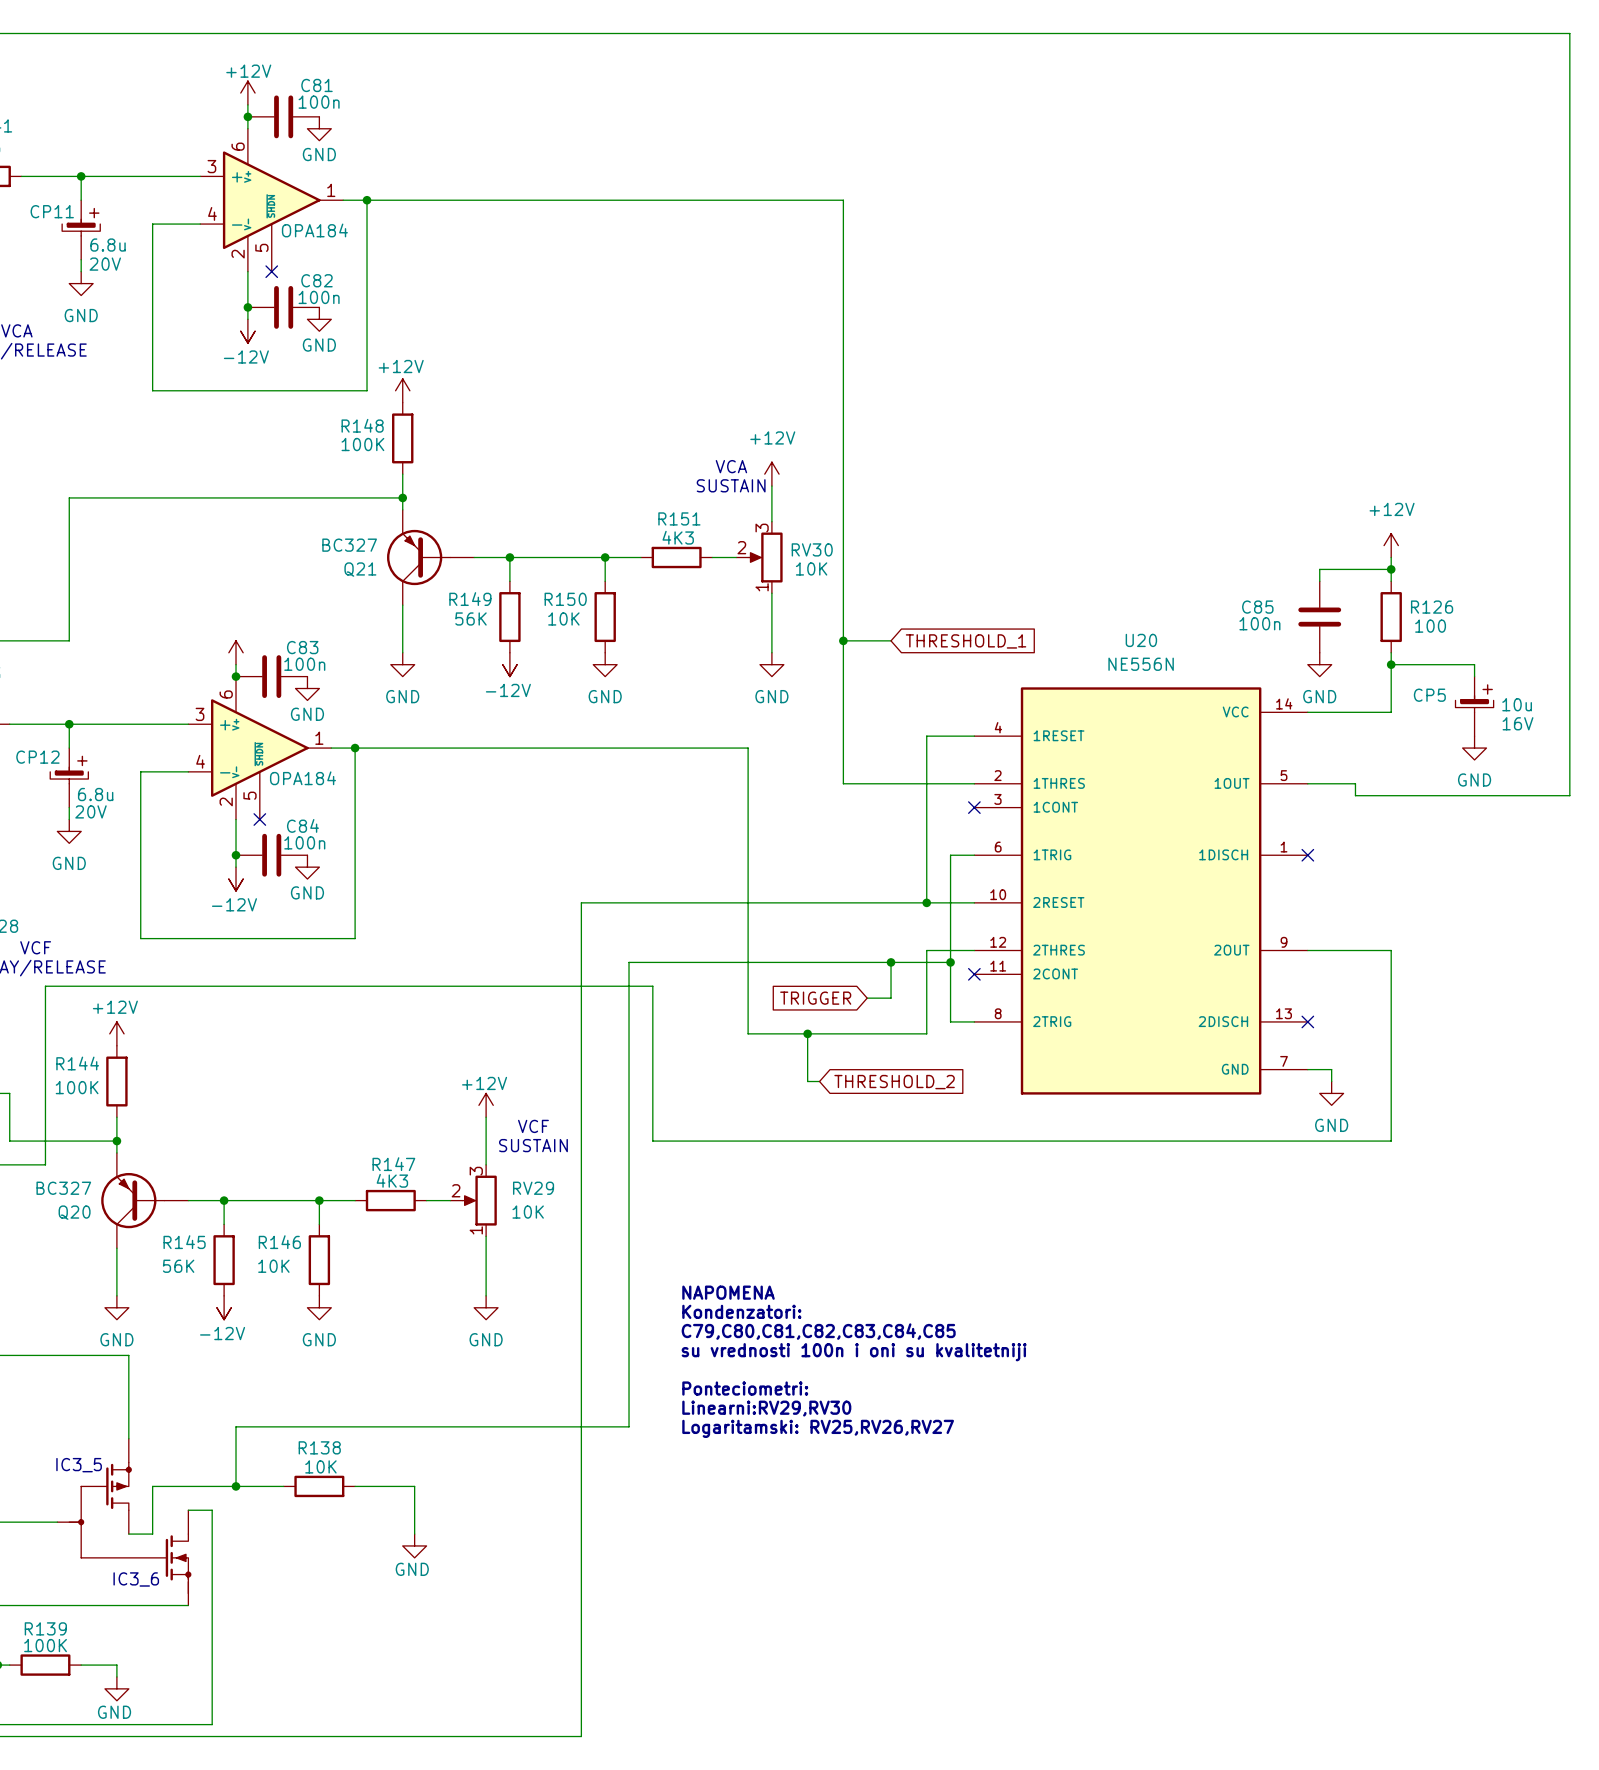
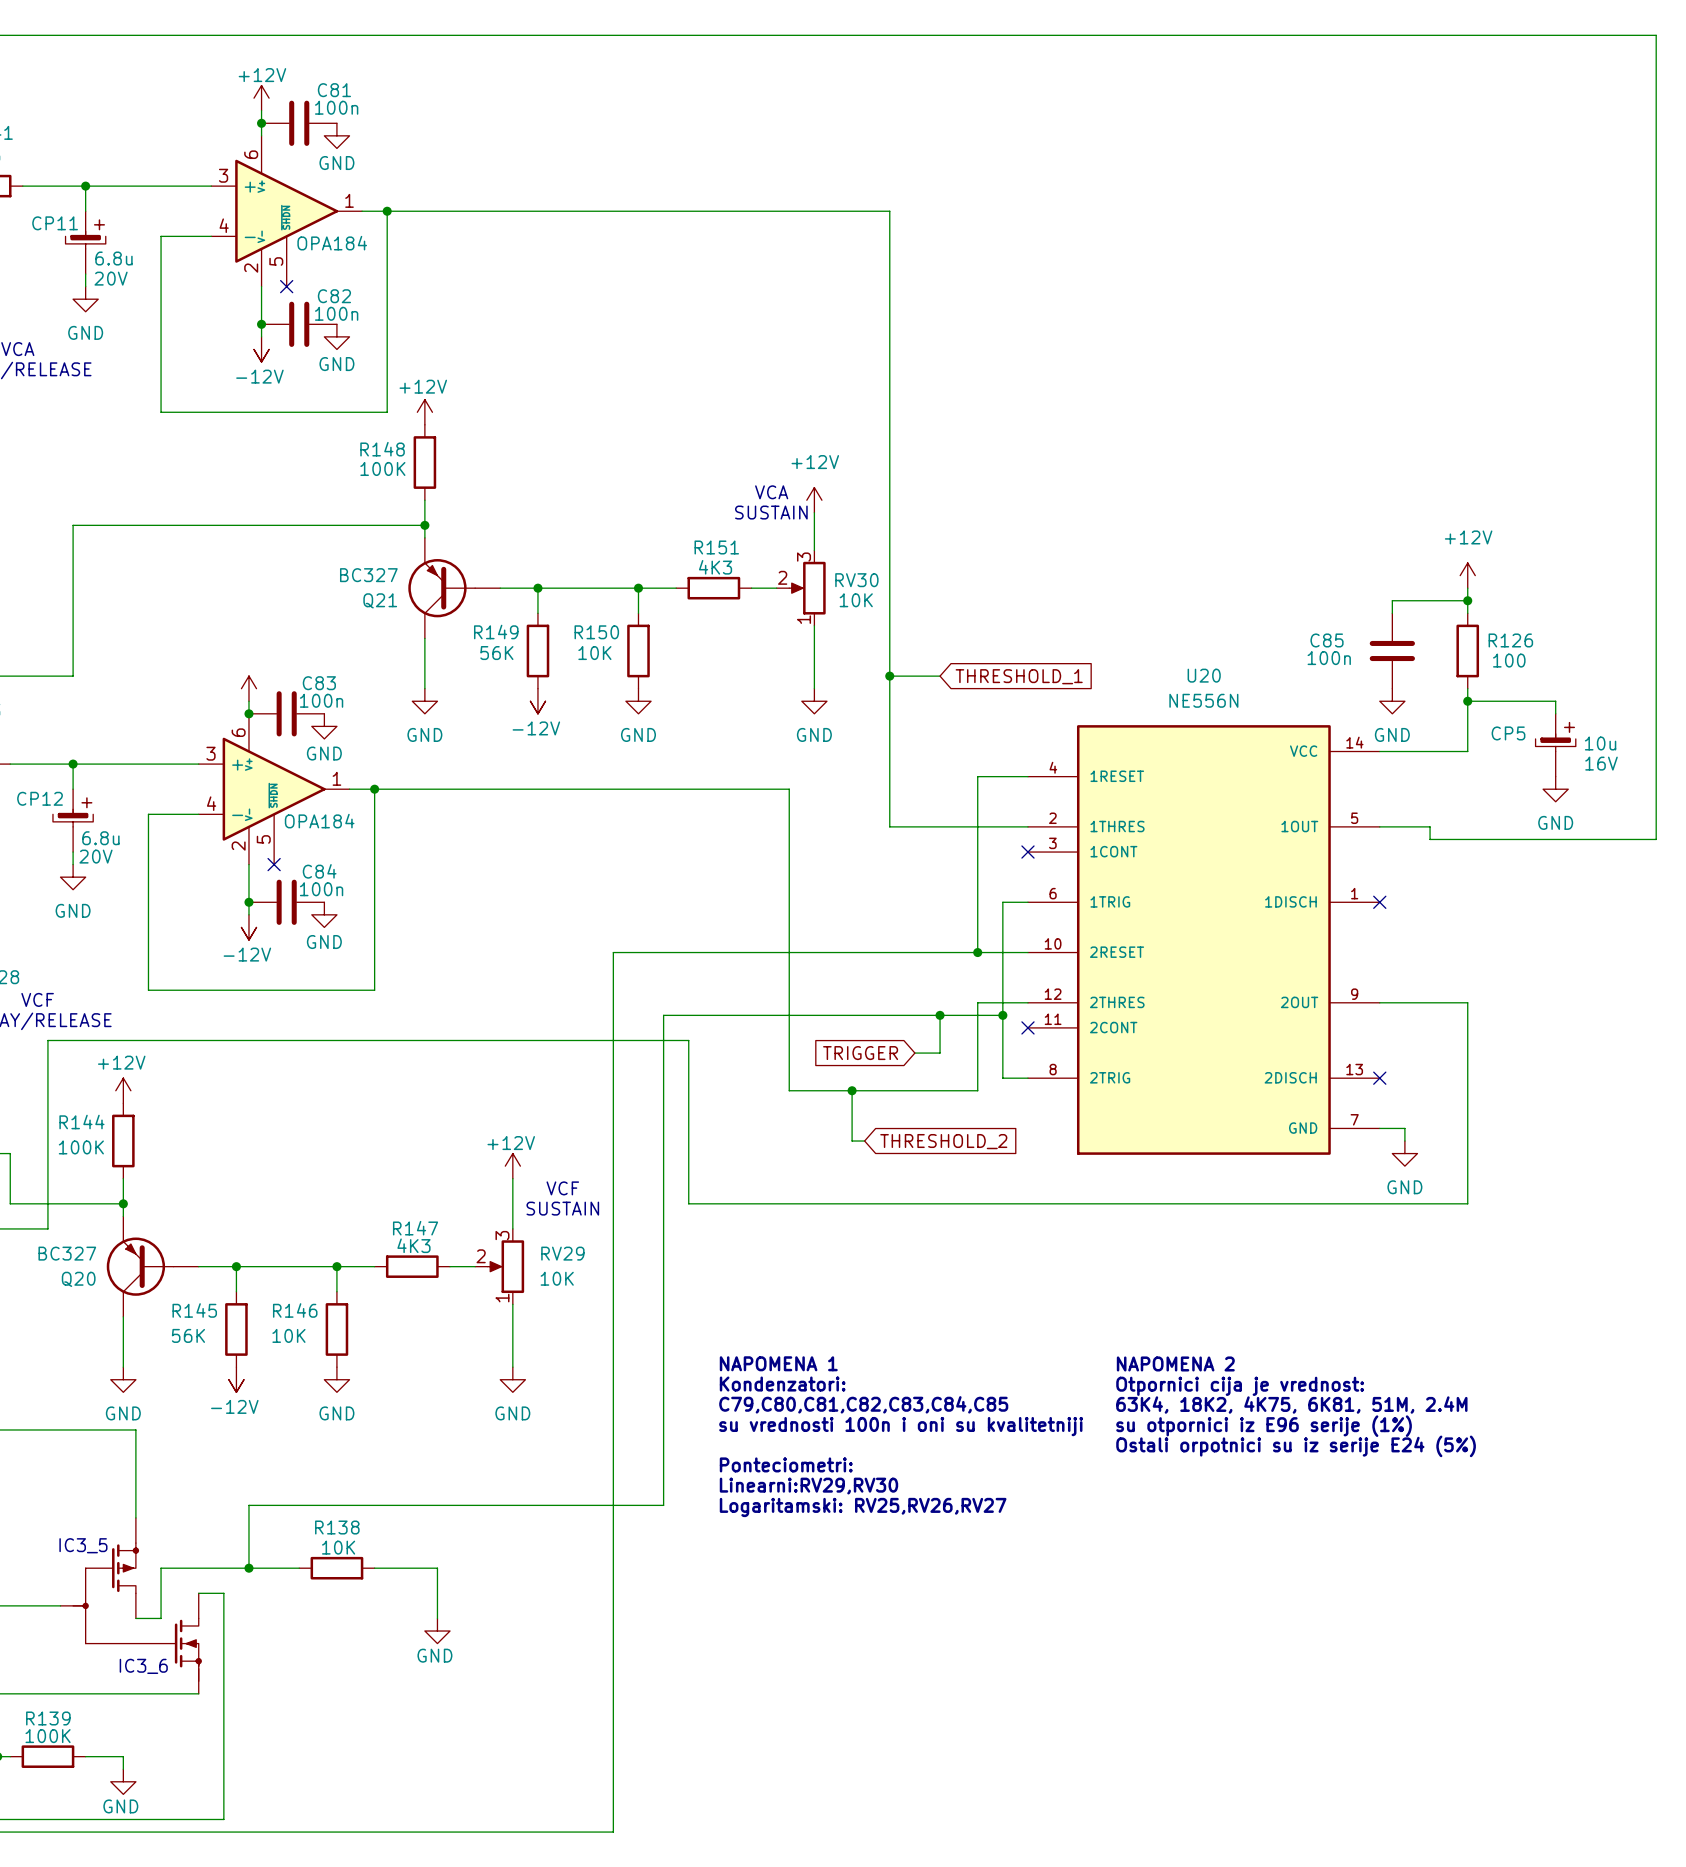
text: NAPOMENA (728, 1292) -> NAPOMENA 1 (778, 1363)
text: none -> NAPOMENA 2 (1175, 1363)
text: none -> Otpornici cija je vrednost: (1240, 1386)
text: none -> 63K4, 18K2, 4K75, 6K81, 51M, 2.4M (1291, 1405)
text: none -> su otpornici iz E96 serije (1%) (1264, 1426)
text: none -> Ostali orpotnici su iz serije E24 (5%) (1296, 1446)

